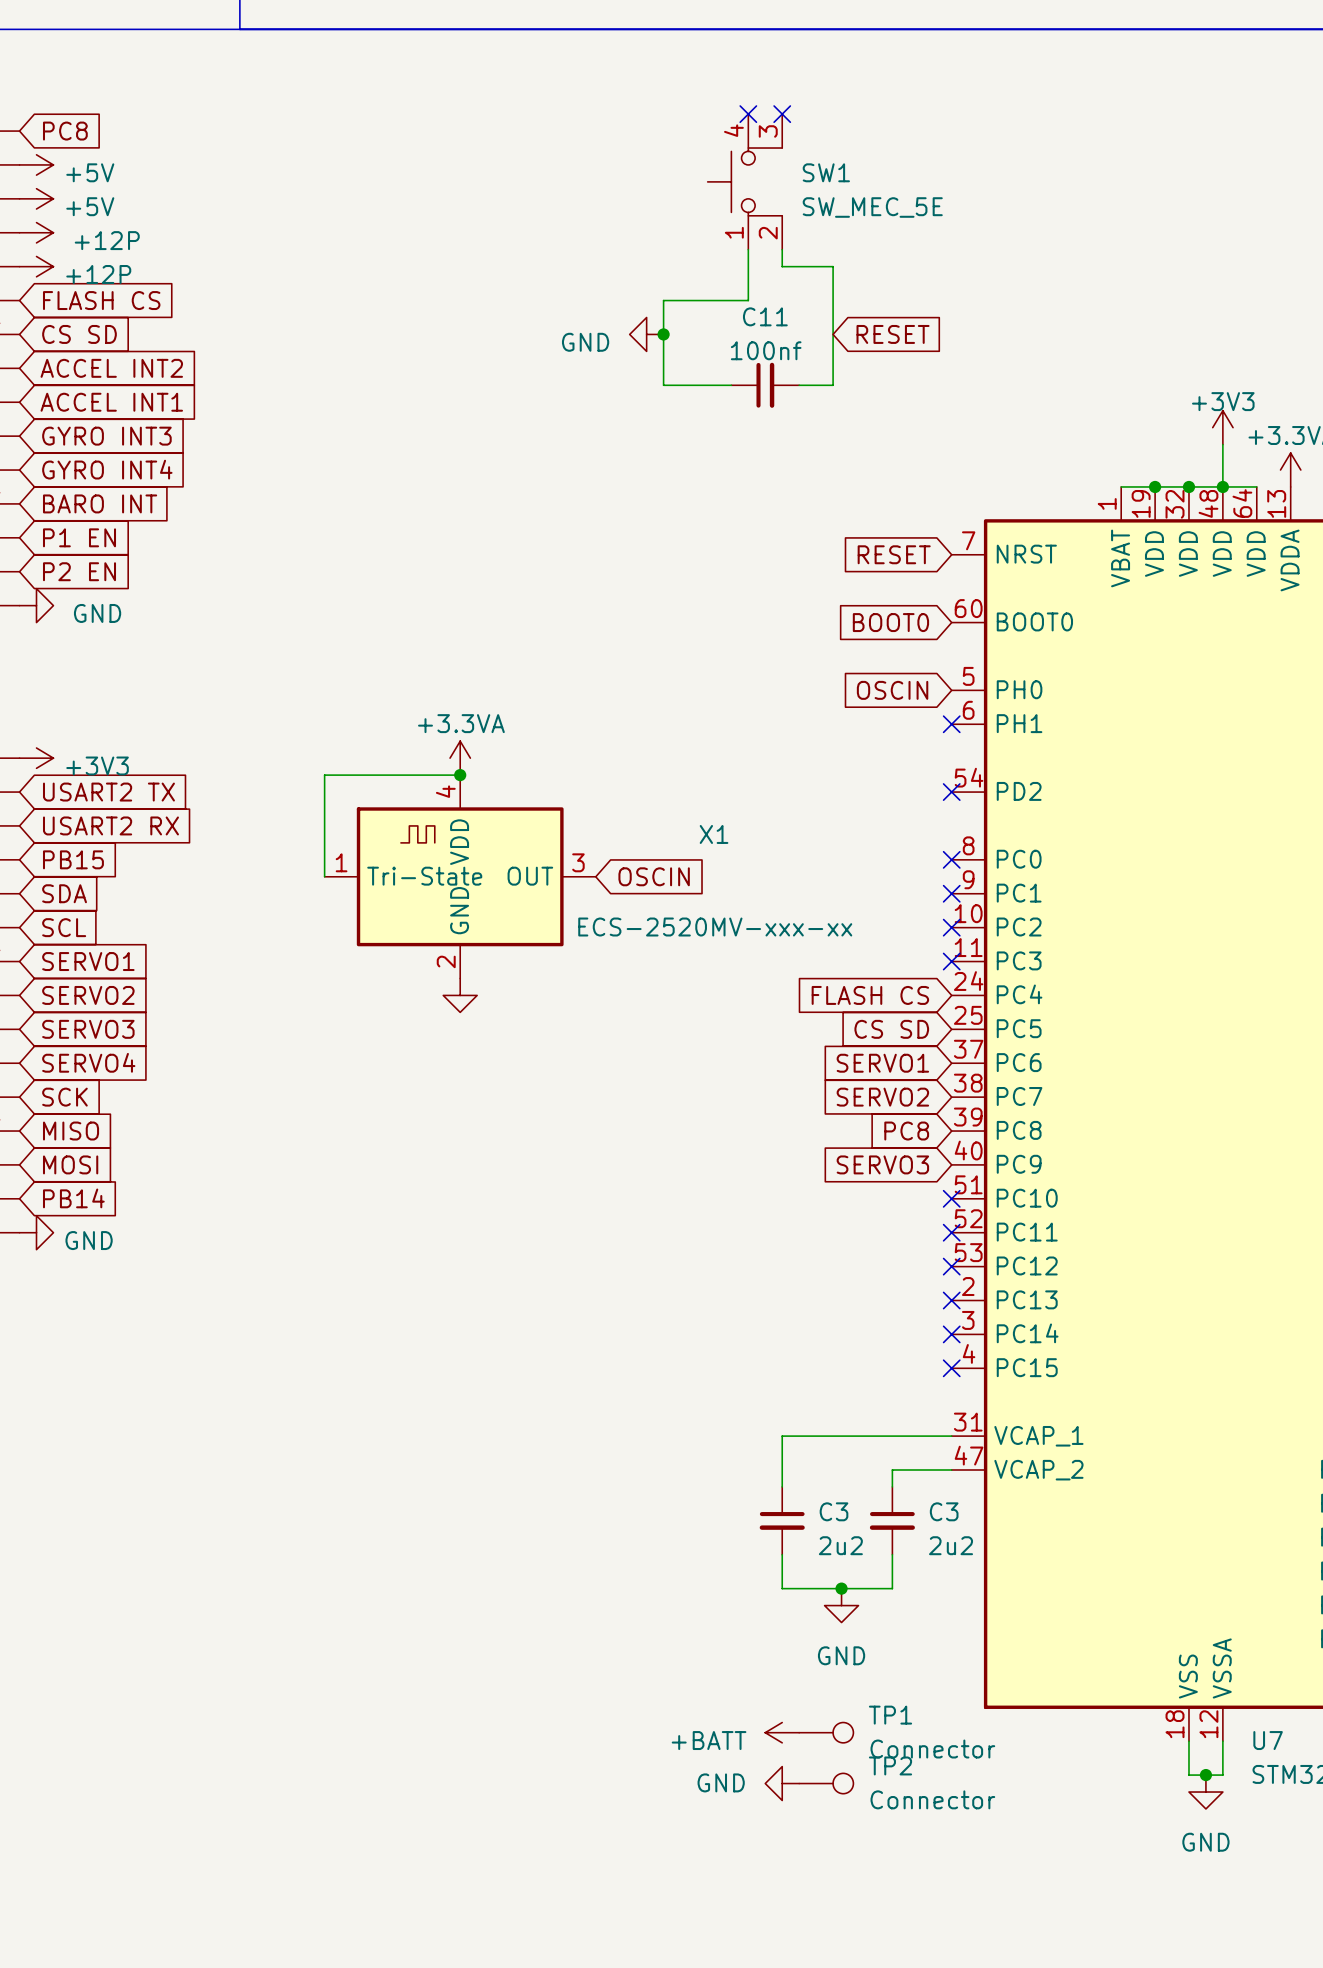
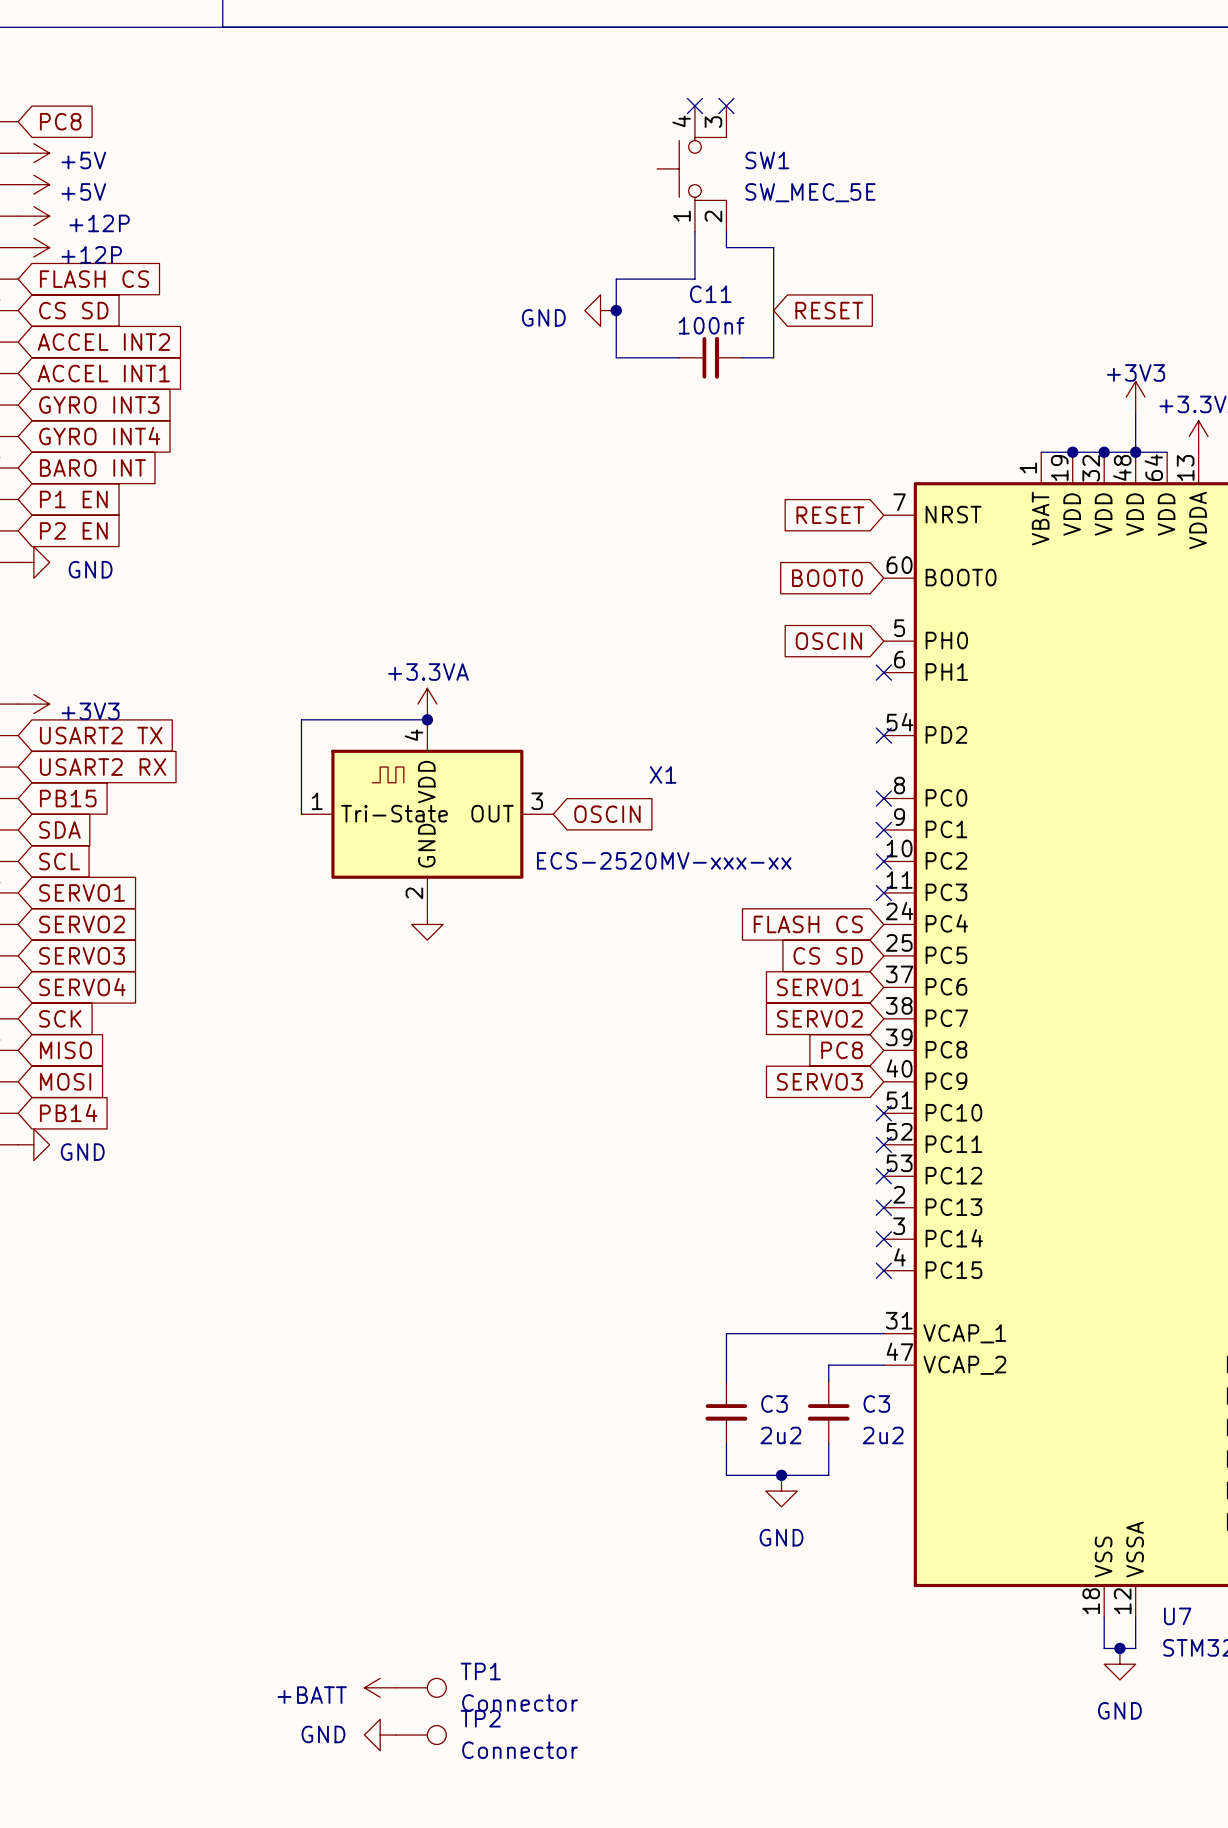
power symbol: +BATT (782, 1732) -> none
TP1 position: (826, 1732) -> (421, 1687)
power symbol: GND (782, 1783) -> none
TP2 position: (826, 1783) -> (421, 1735)
power symbol: none -> +BATT (380, 1687)
power symbol: none -> GND (380, 1735)

